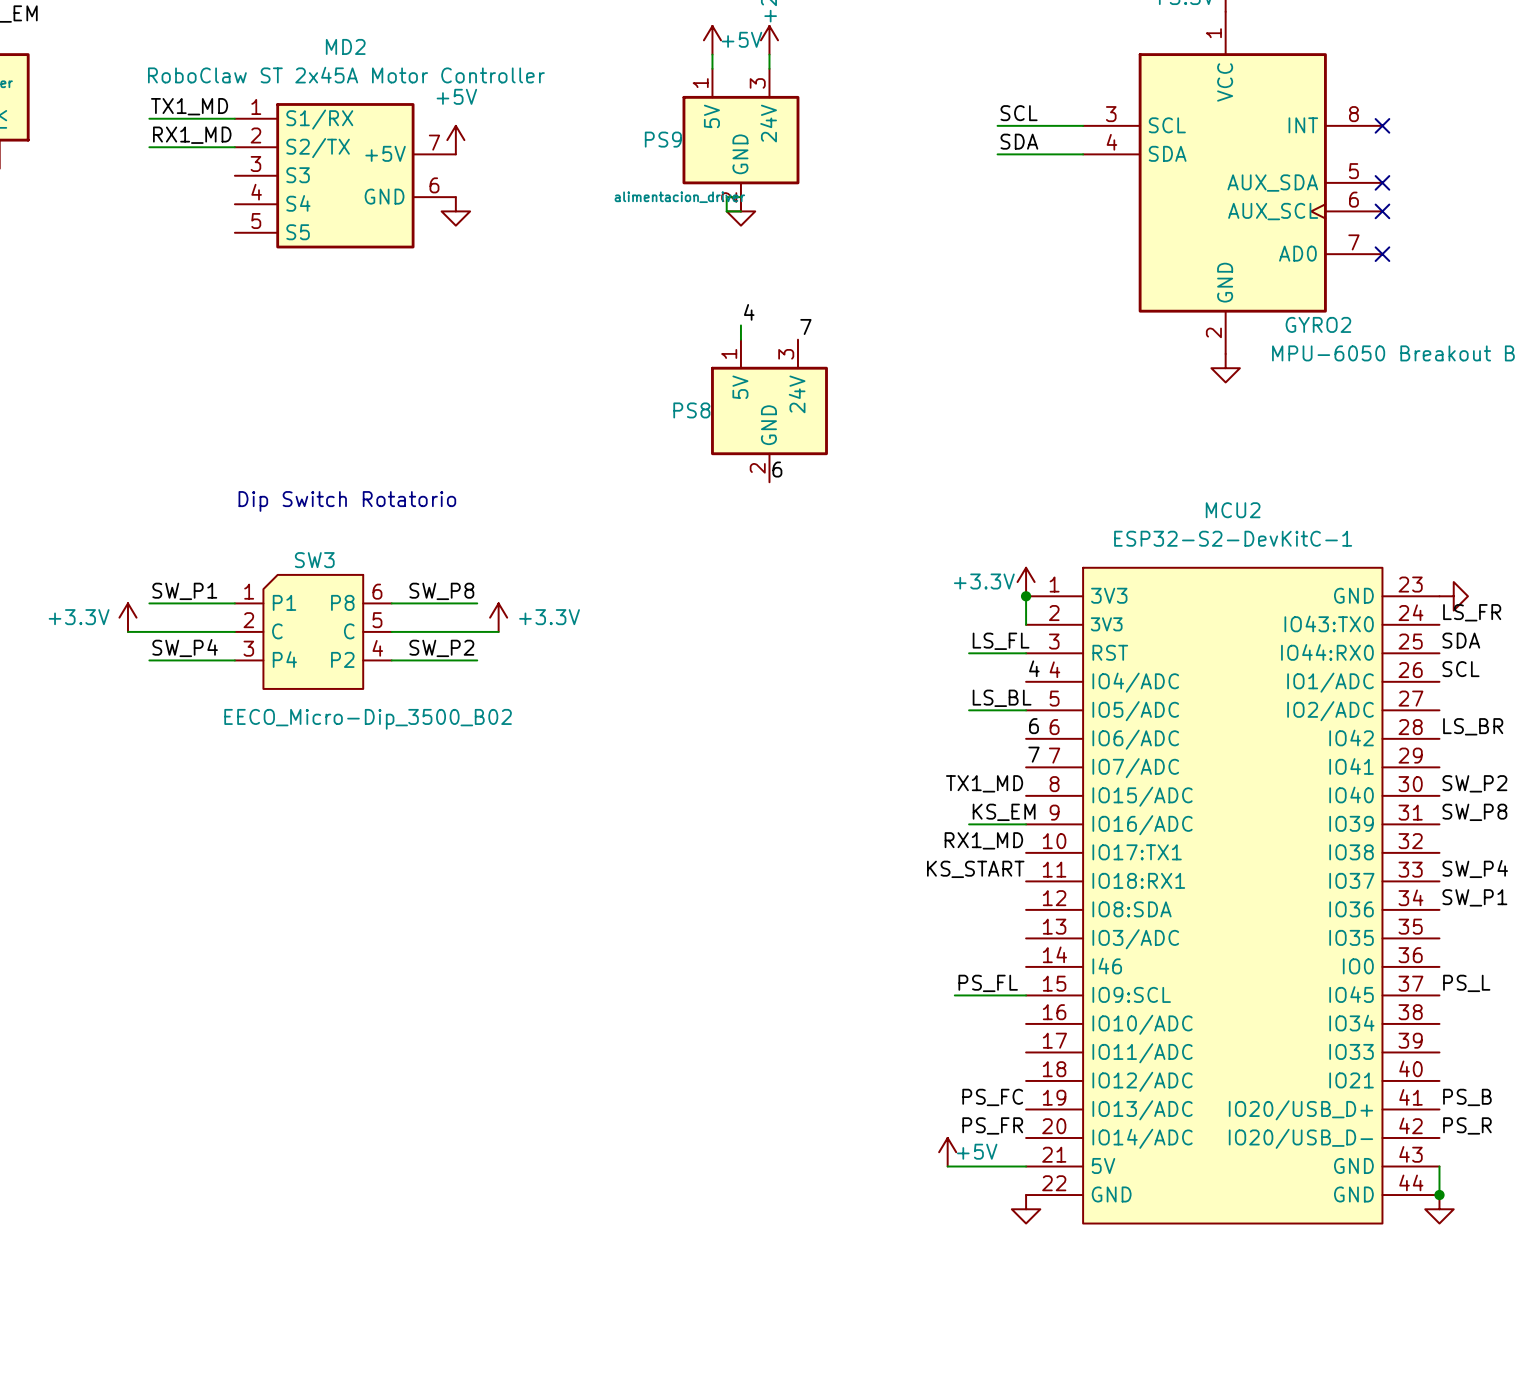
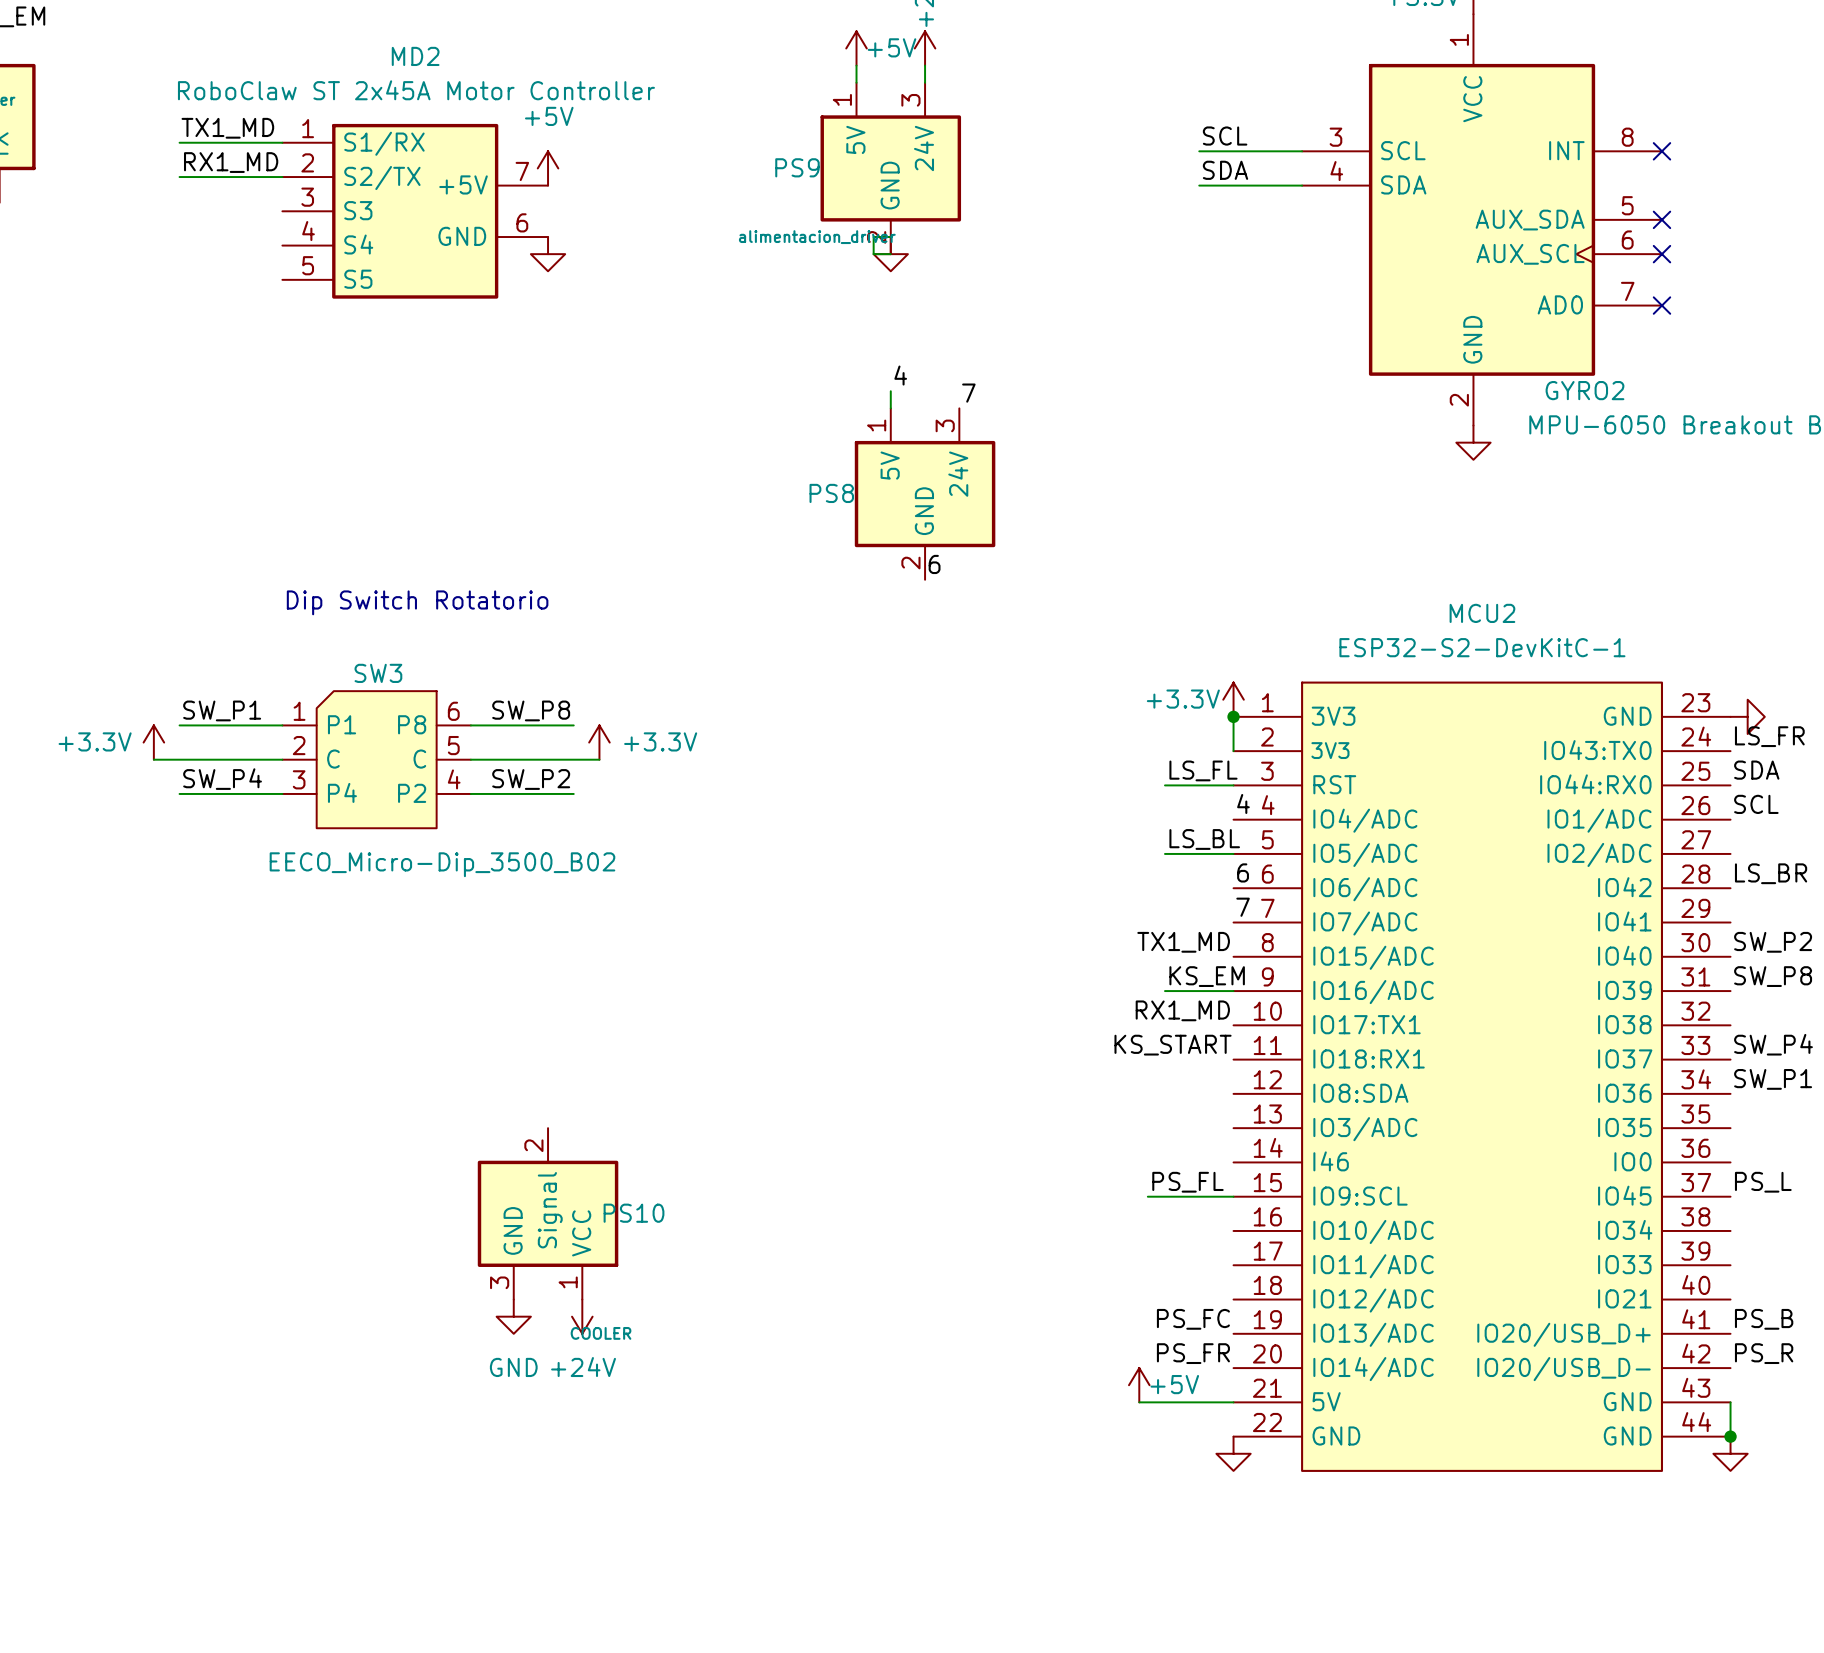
PS10: none -> COOLER (548, 1213)
power symbol: none -> GND (513, 1316)
power symbol: none -> +24V (582, 1316)

